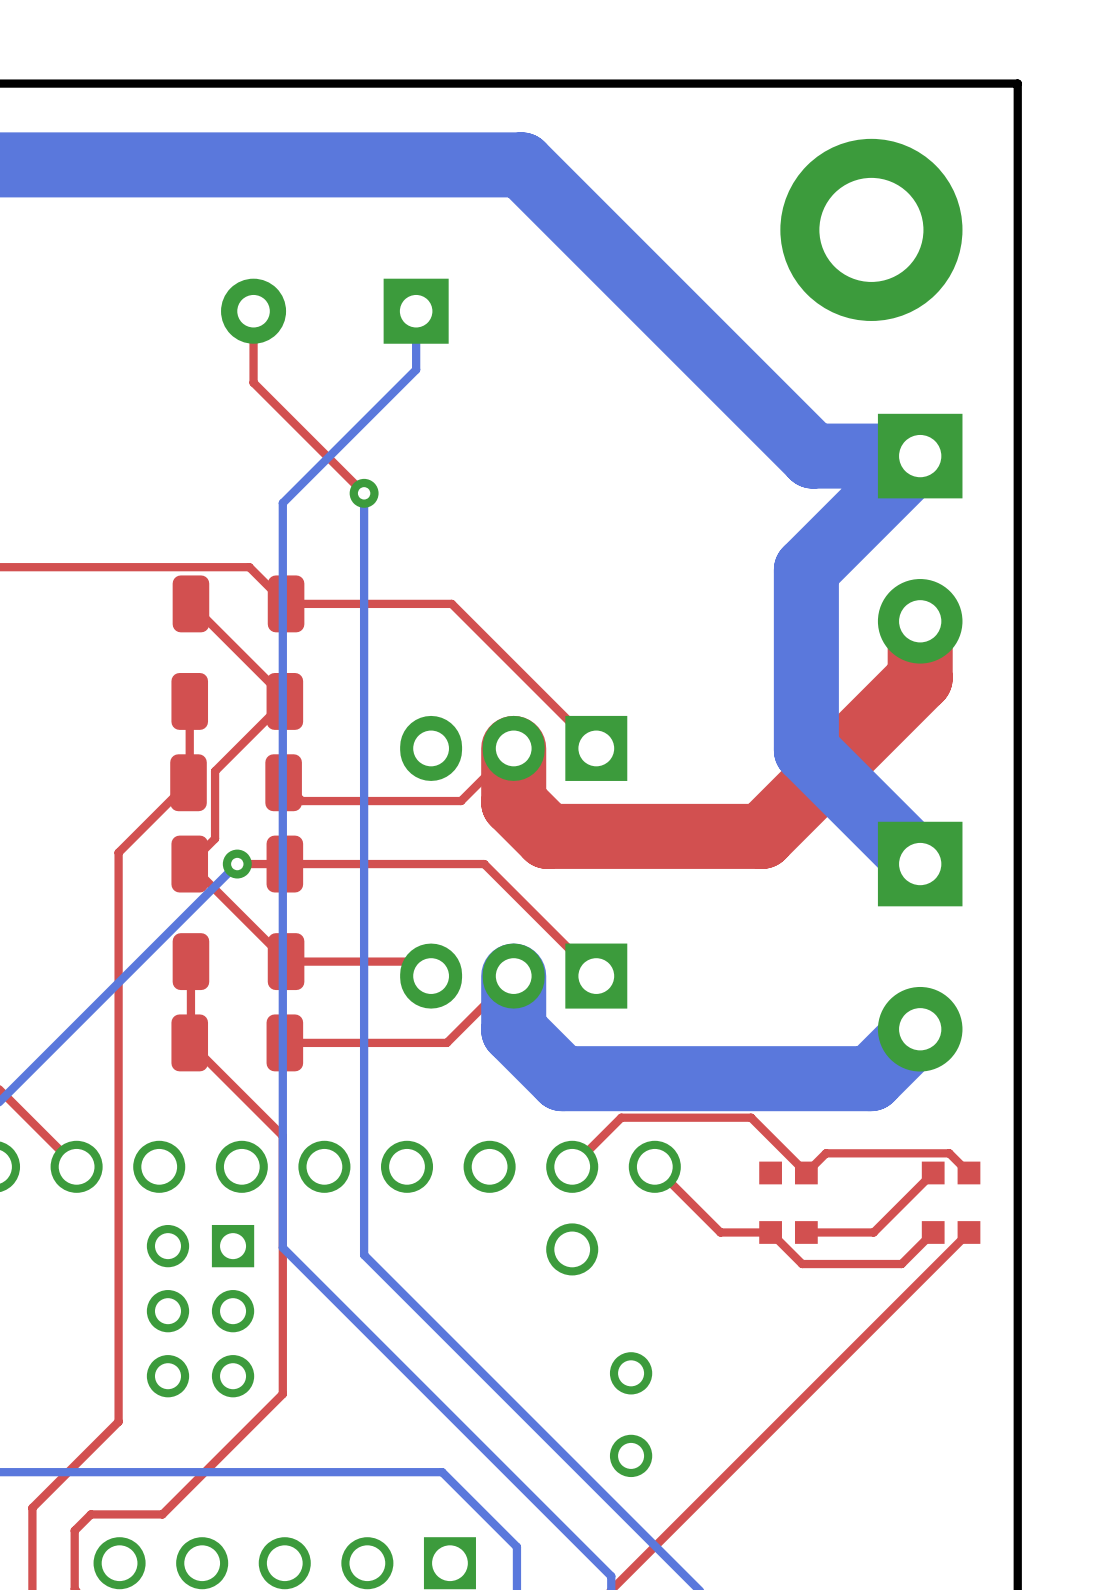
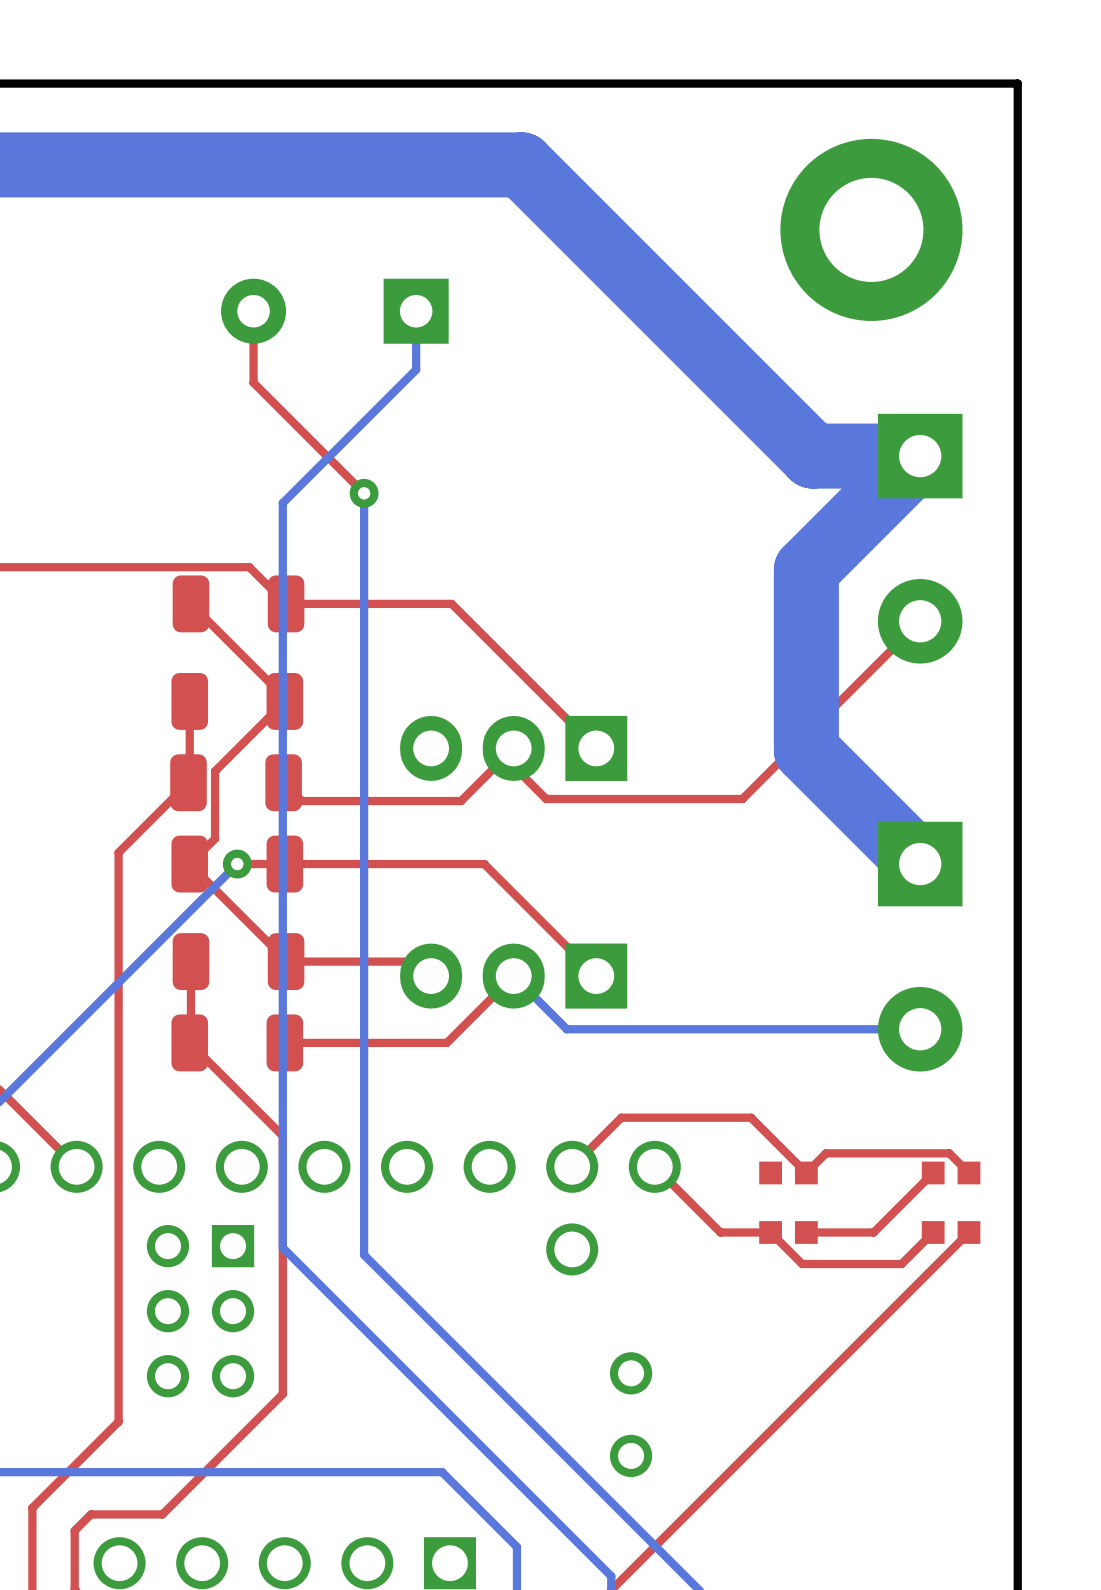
top track: (920, 621) (920, 678) (761, 836) (547, 836) (513, 802) (513, 748) -> (920, 621) (742, 799) (546, 799) (513, 766)
bottom track: (513, 976) (513, 1030) (562, 1078) (870, 1078) (920, 1029) -> (513, 976) (566, 1029) (920, 1029)

